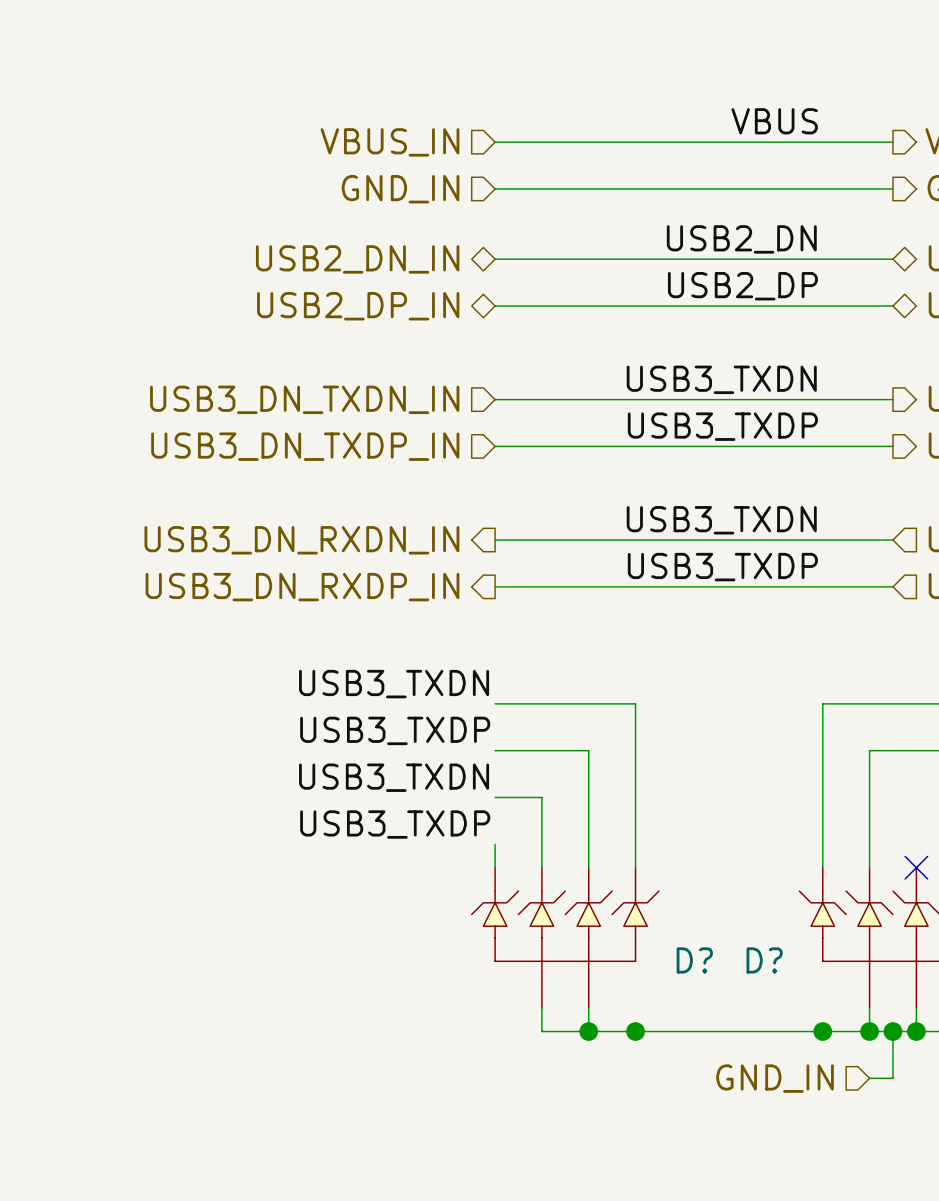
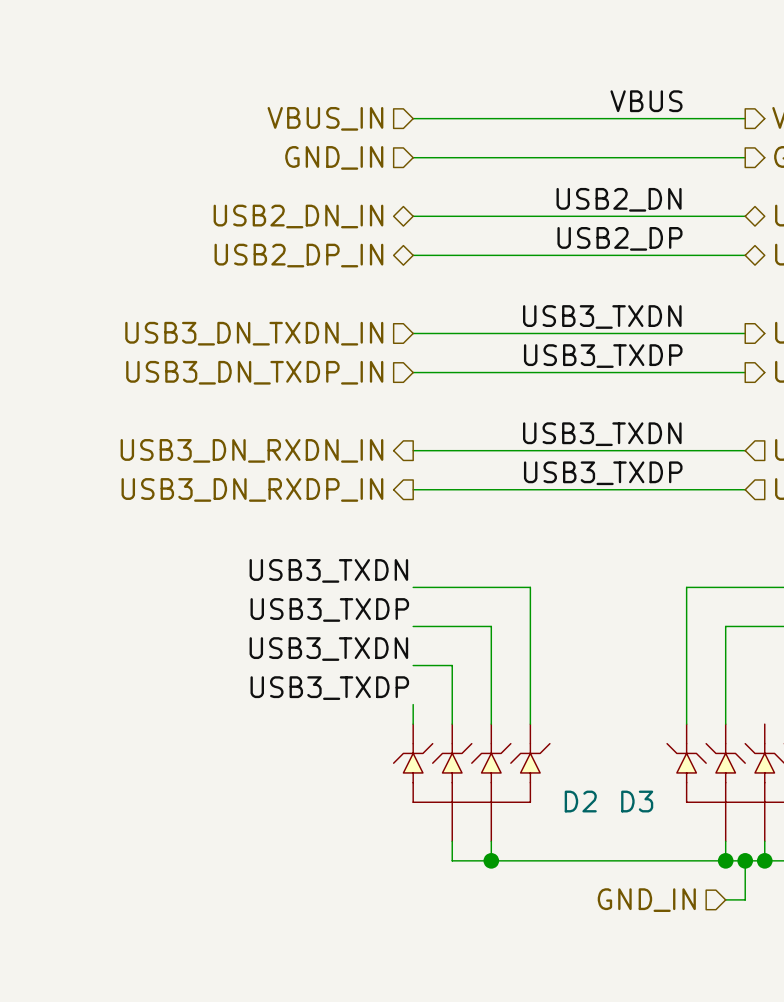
no-connect mark: (916, 867) -> none
D? name: D? (694, 960) -> D2 (580, 801)
D? name: D? (764, 960) -> D3 (637, 801)
junction: (635, 1031) -> none
junction: (822, 1031) -> none

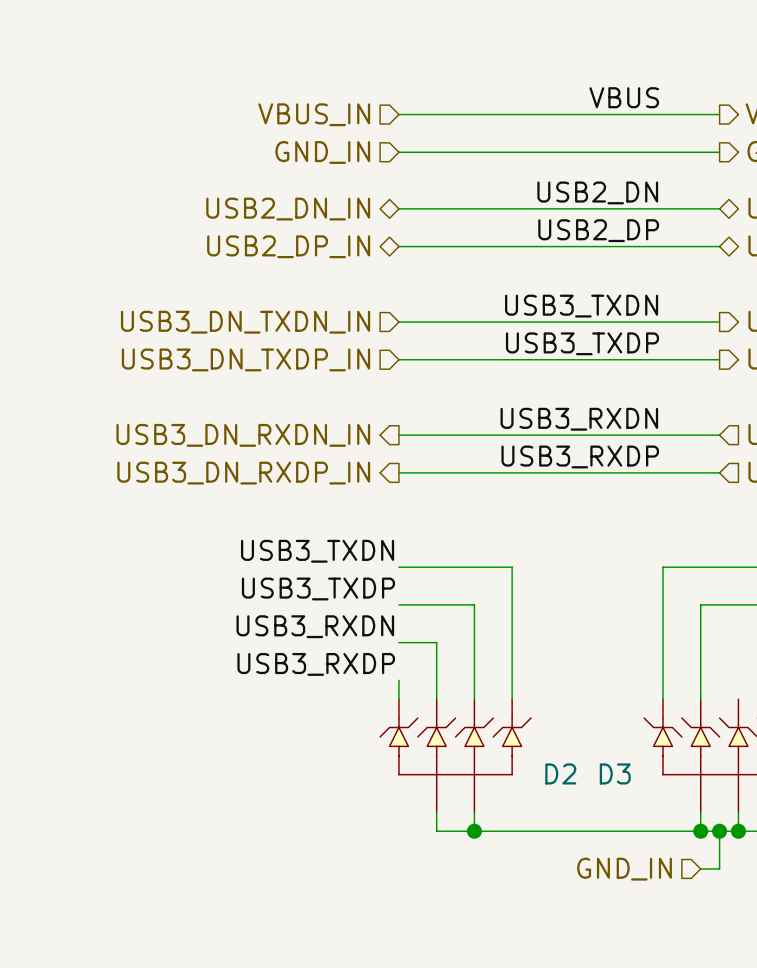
label: USB3_TXDN (602, 434) -> USB3_RXDN (579, 419)
label: USB3_TXDP (603, 473) -> USB3_RXDP (580, 456)
label: USB3_TXDN (328, 649) -> USB3_RXDN (315, 626)
label: USB3_TXDP (329, 688) -> USB3_RXDP (316, 664)

